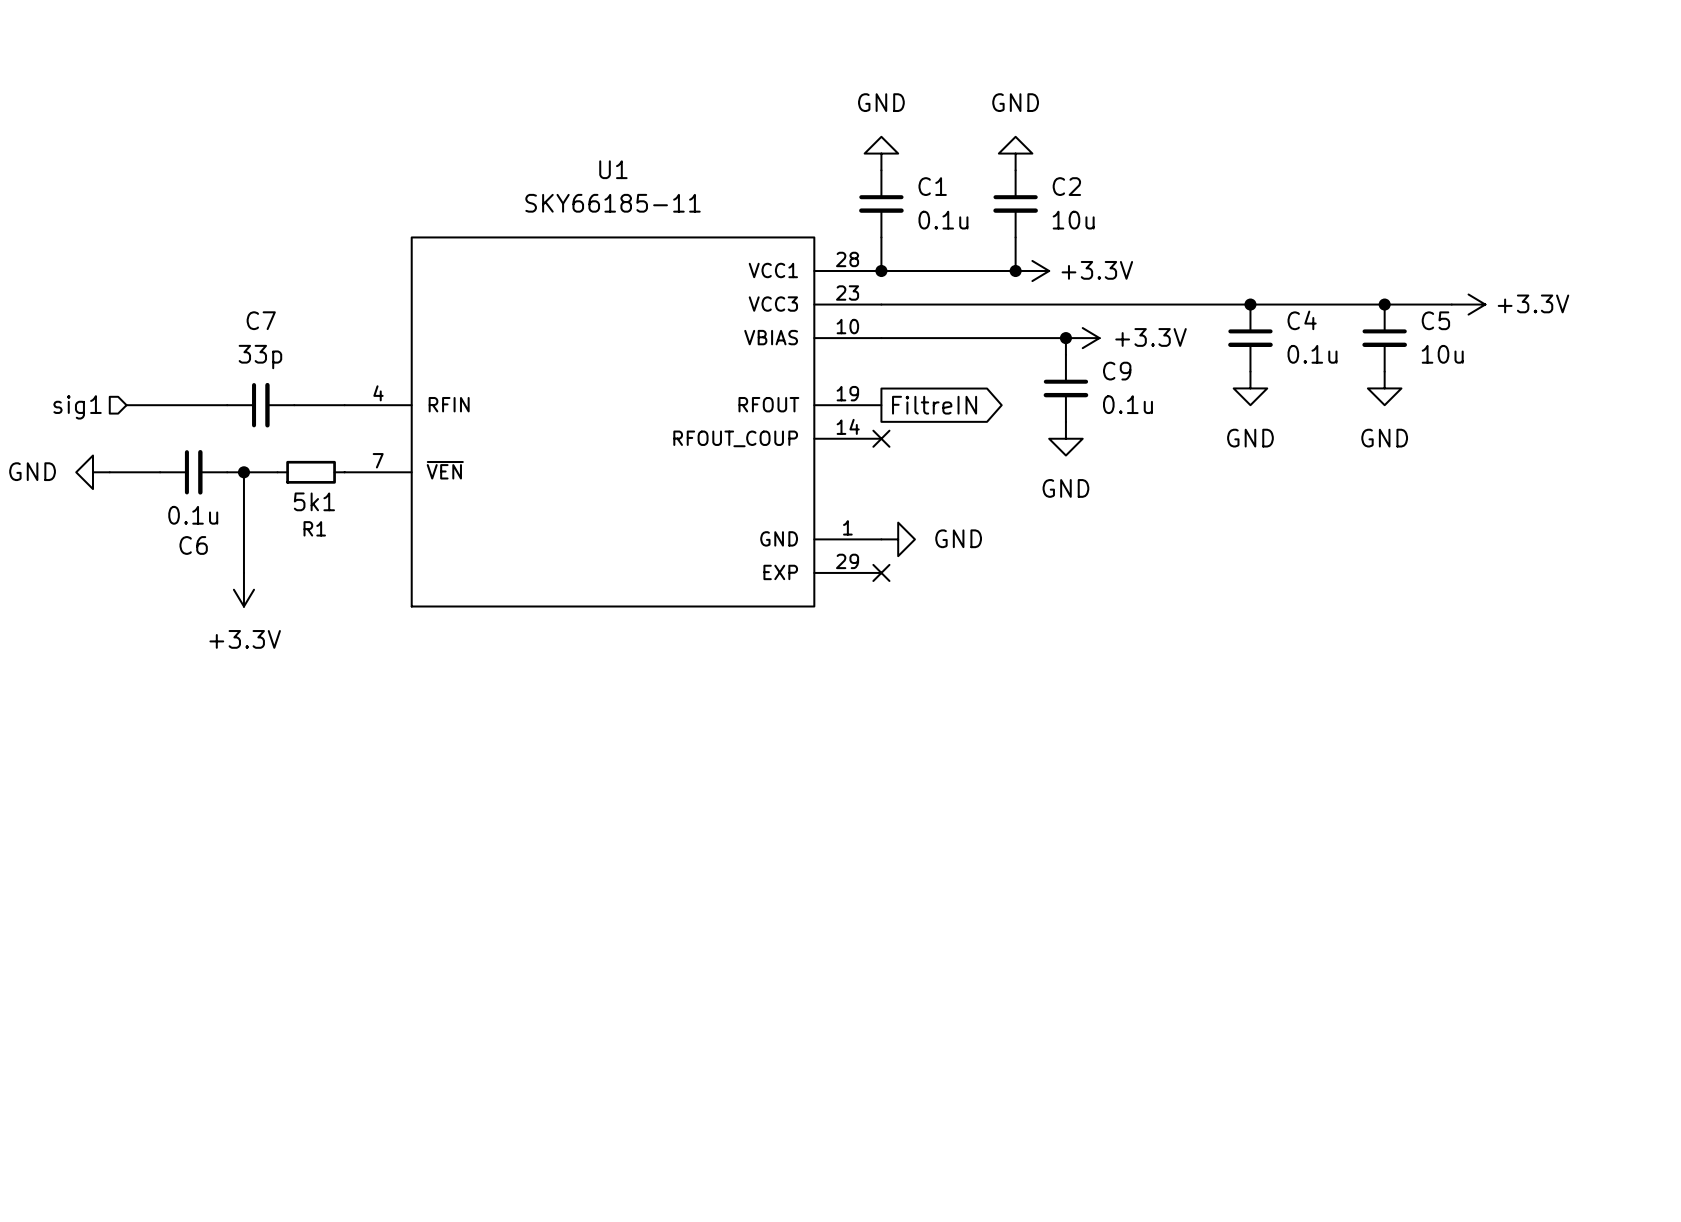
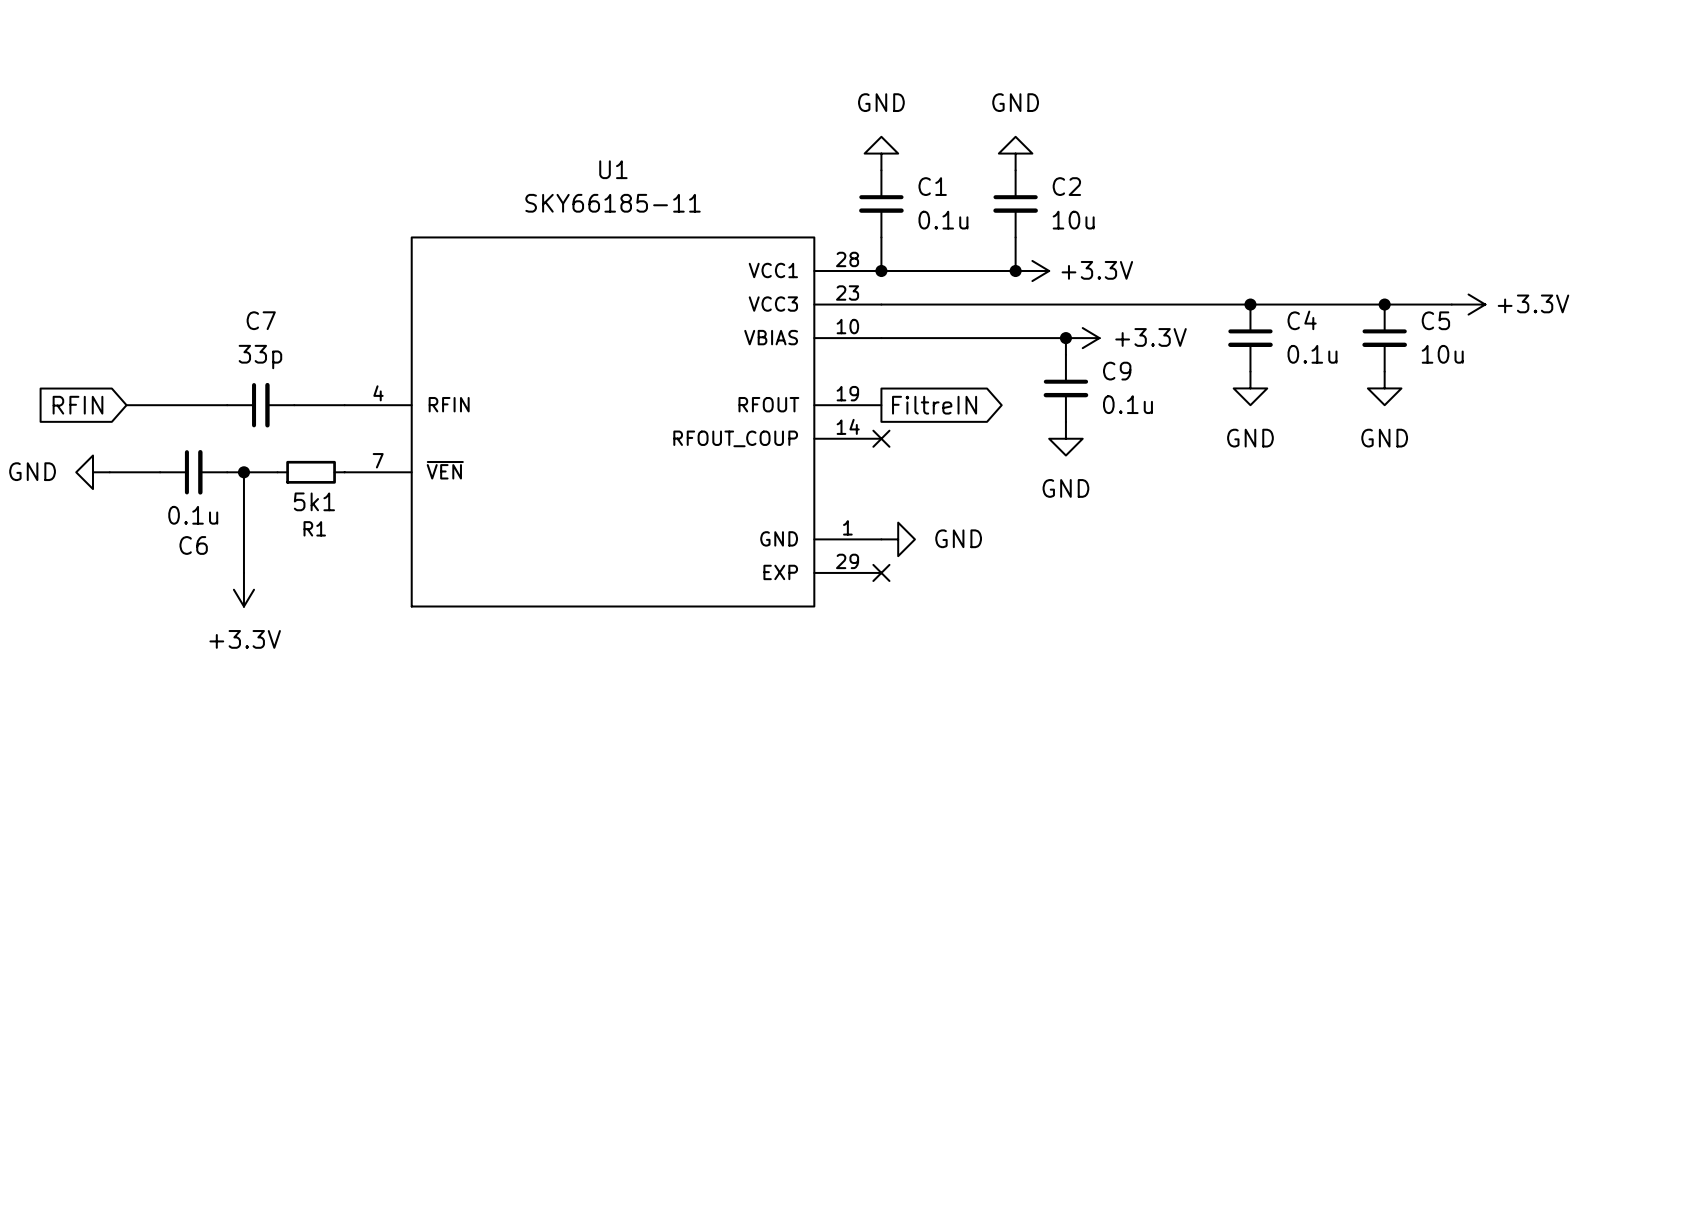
global label: none -> RFIN (77, 405)
hierarchical label: sig1 (77, 407) -> none

